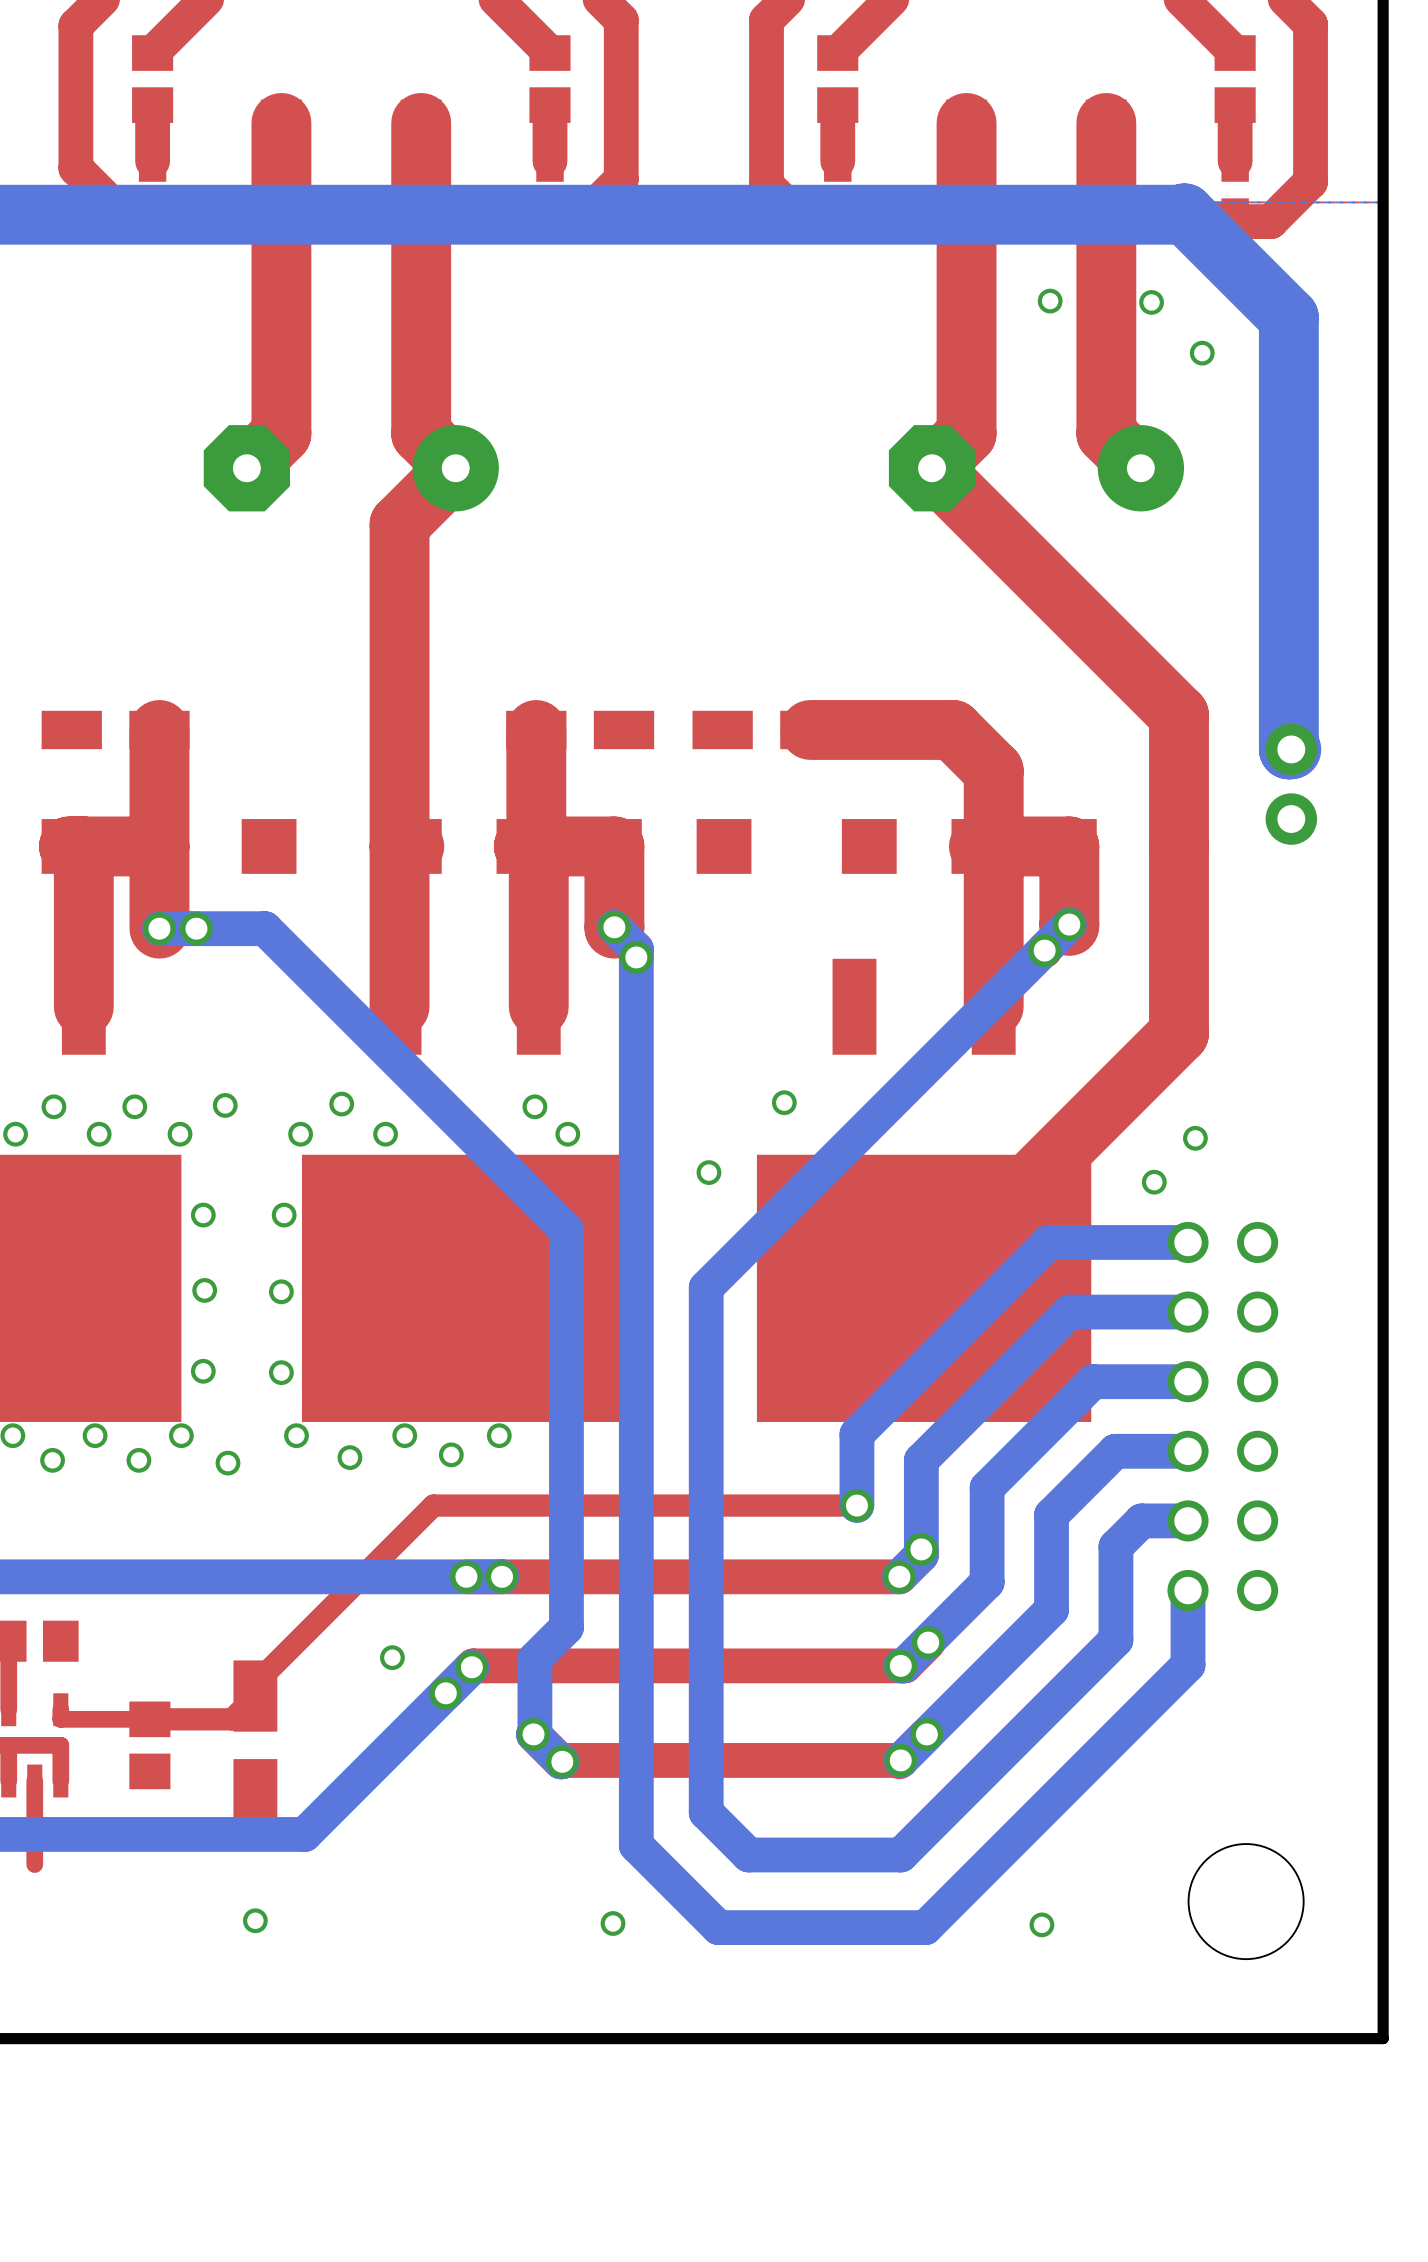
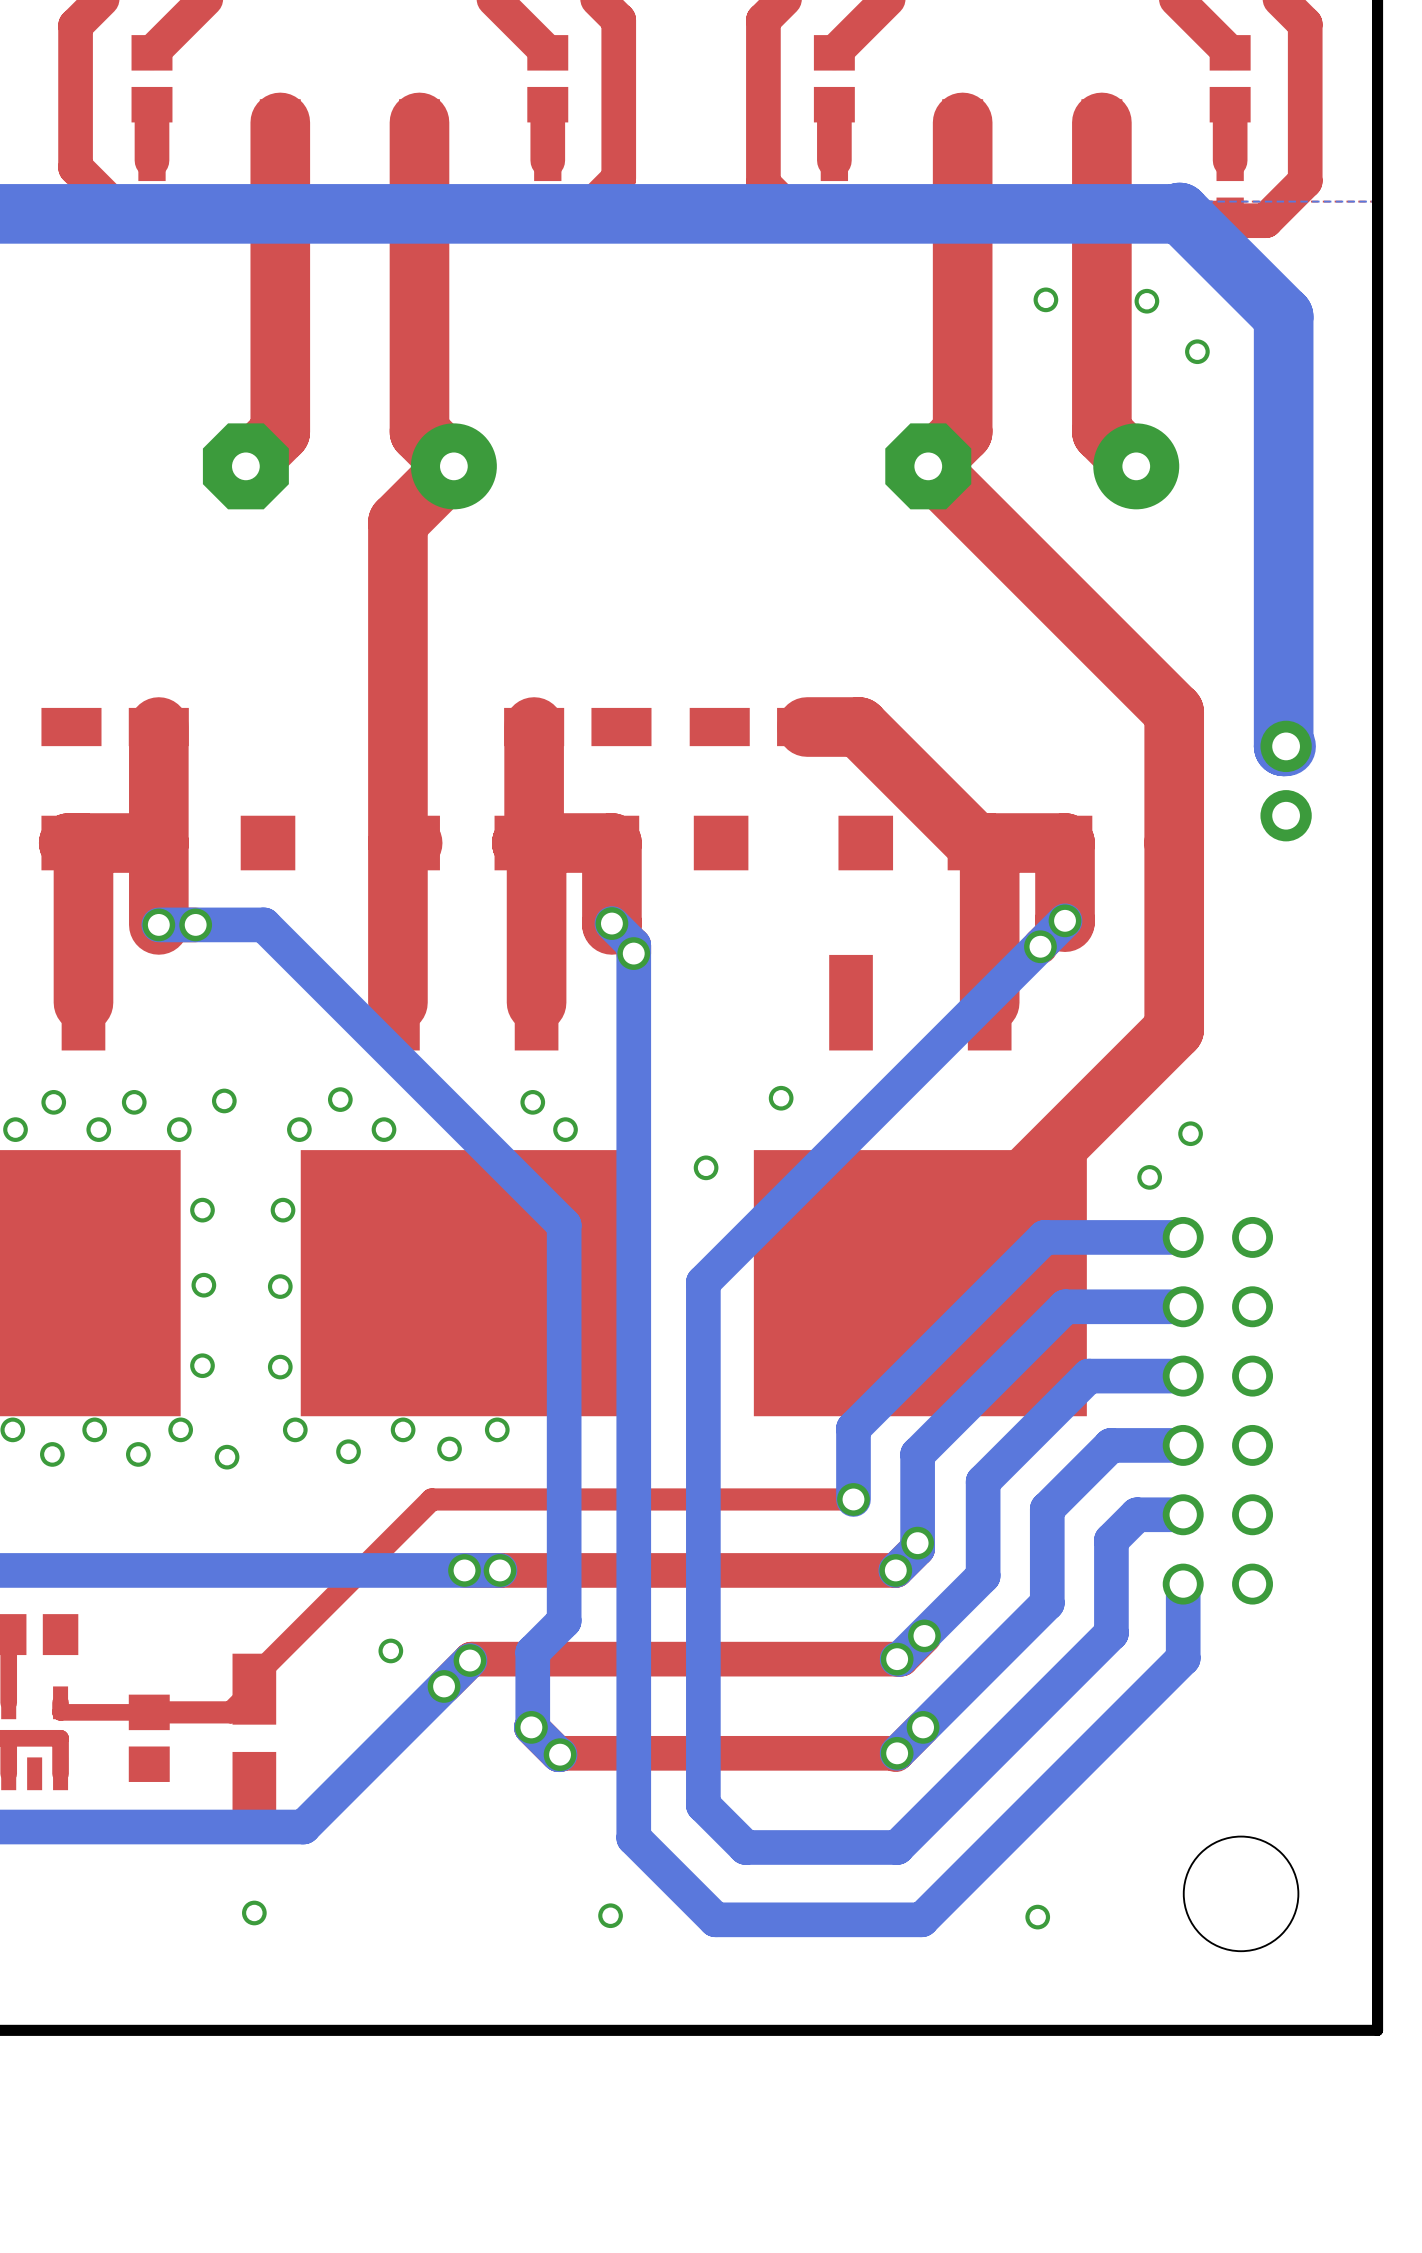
top track: (862, 729) (952, 729) (993, 770) (993, 846) -> (858, 727) (974, 843)
top track: (34, 1781) (34, 1864) -> none

